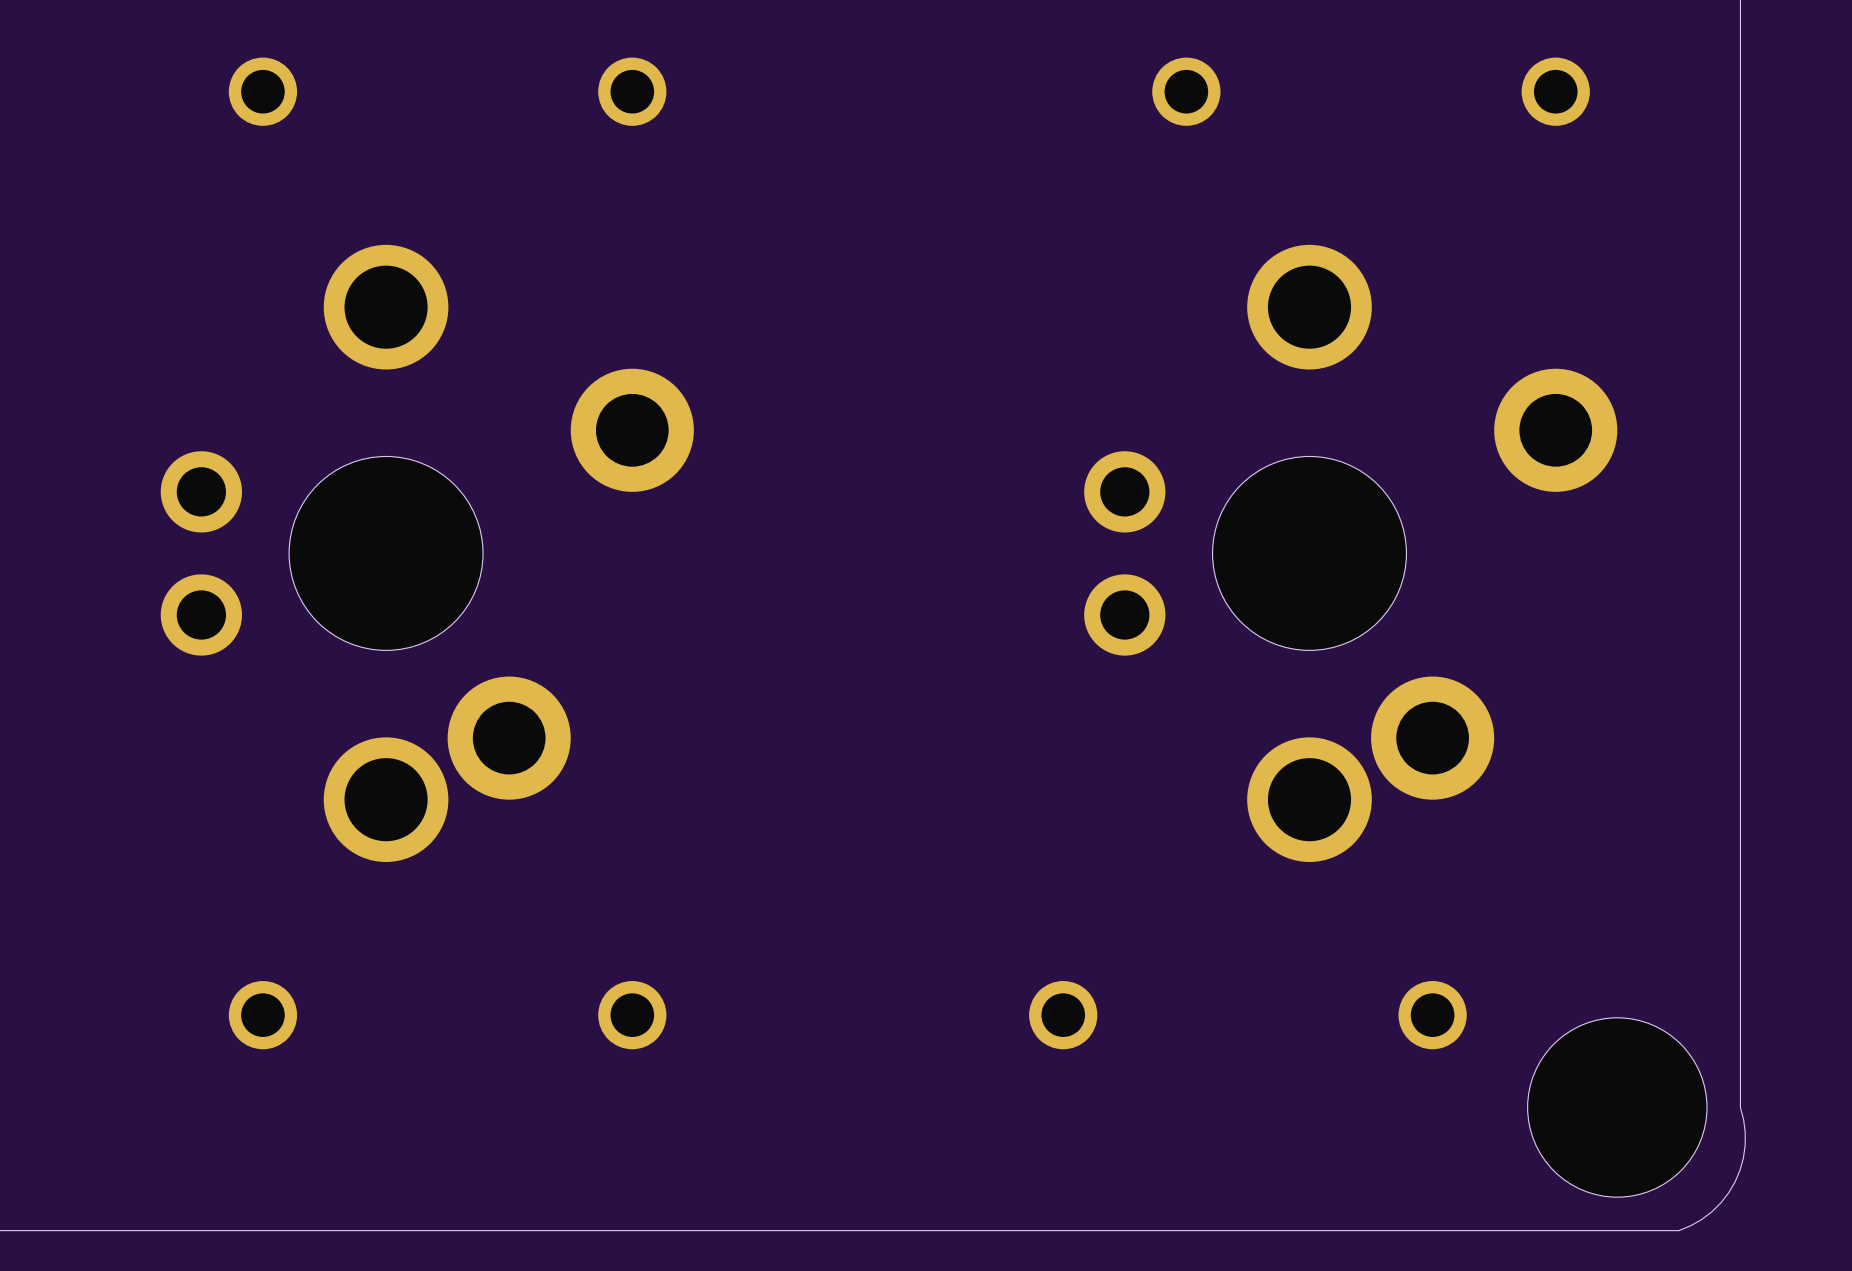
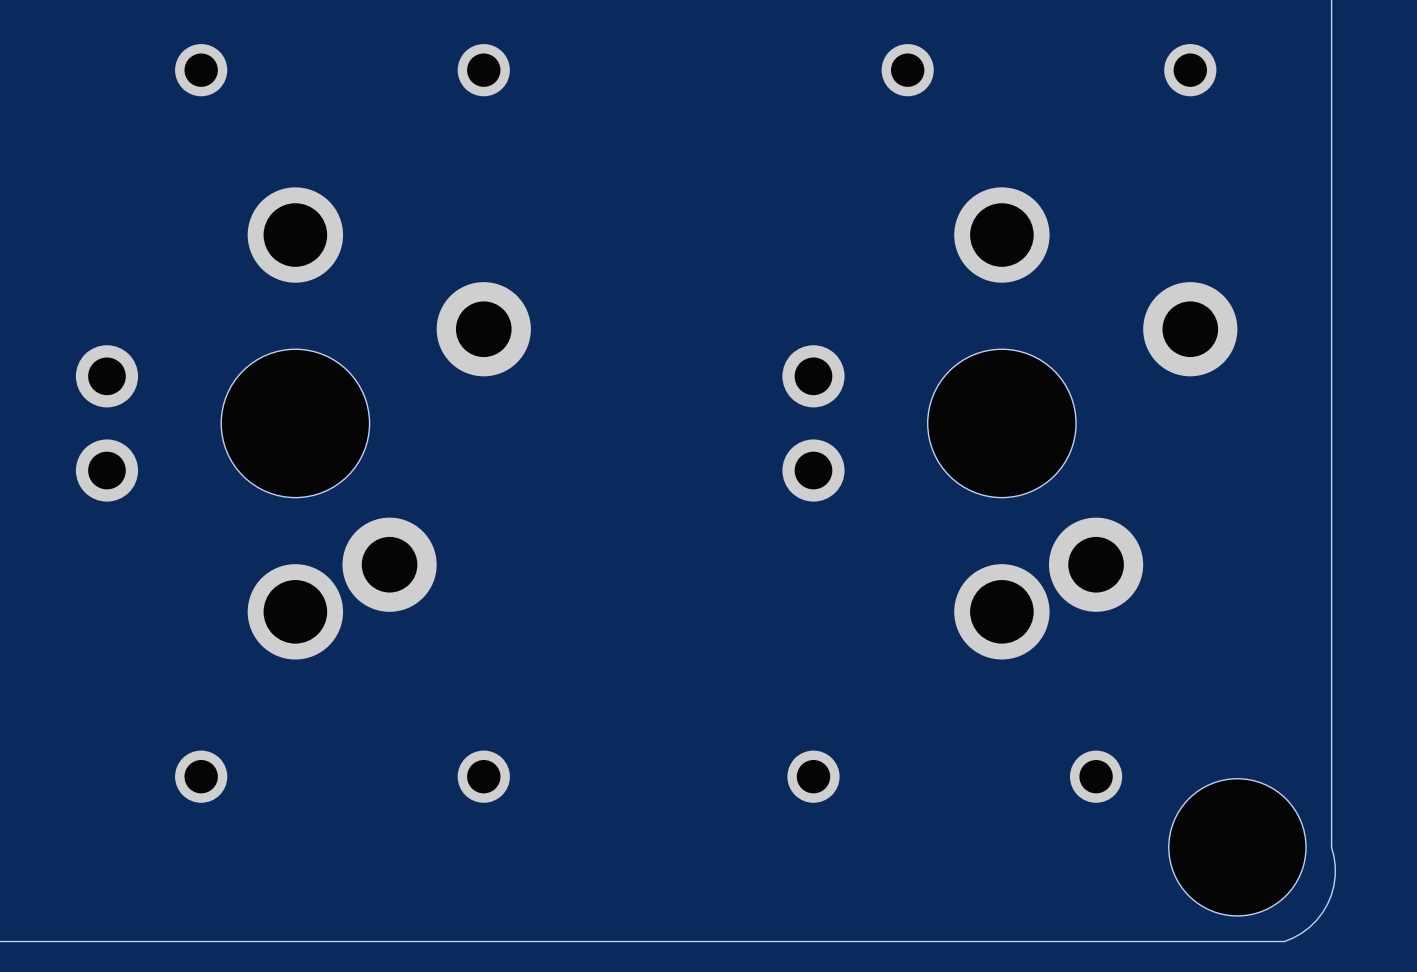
part footprint: [160, 244, 694, 863] -> [75, 187, 531, 660]
part footprint: [1084, 244, 1618, 863] -> [782, 187, 1238, 660]

